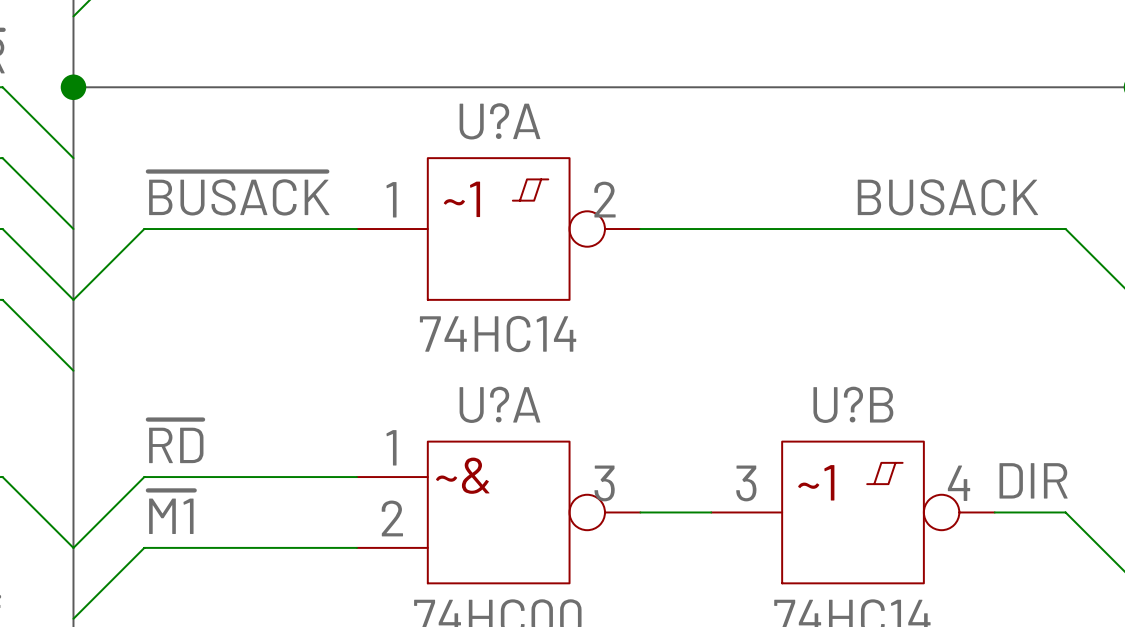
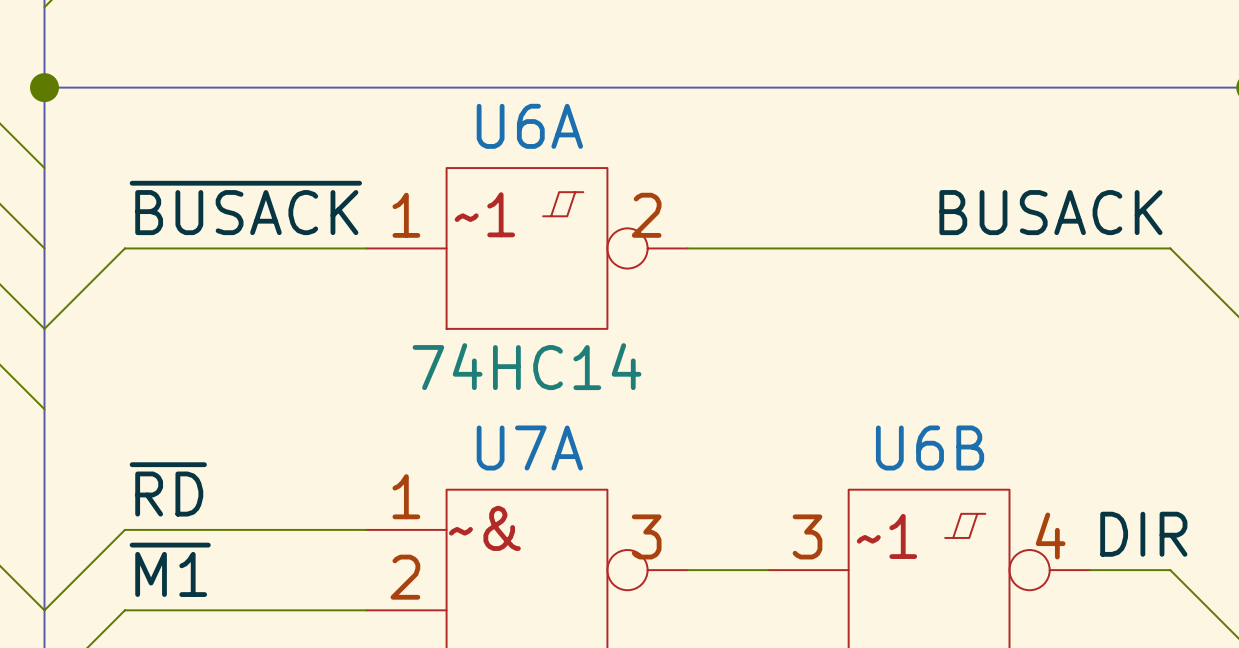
U?A name: U?A (499, 121) -> U6A (529, 126)
U?A name: U?A (499, 404) -> U7A (529, 447)
U?B name: U?B (853, 404) -> U6B (930, 447)

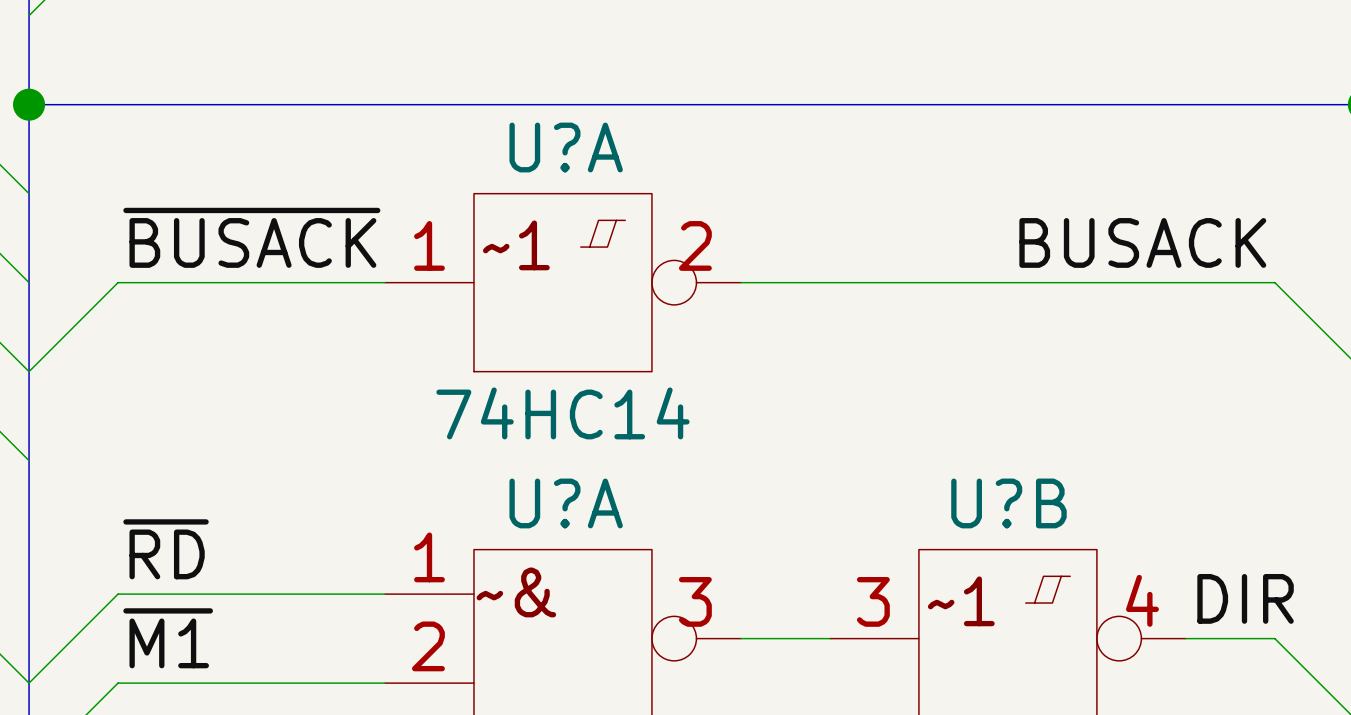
U6A name: U6A (529, 126) -> U?A (566, 147)
U7A name: U7A (529, 447) -> U?A (566, 503)
U6B name: U6B (930, 447) -> U?B (1008, 503)

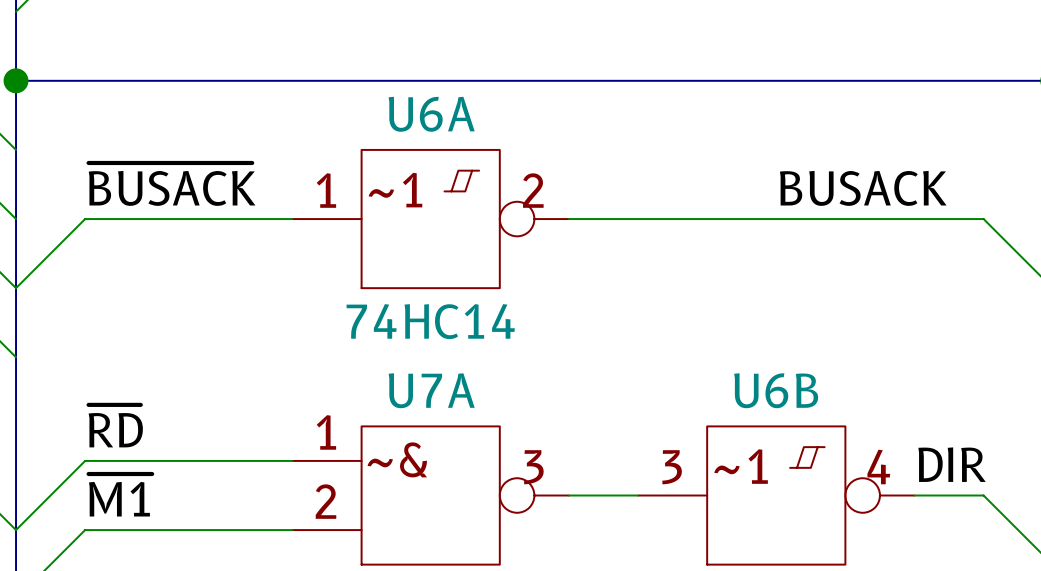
U?A name: U?A (566, 147) -> U6A (431, 114)
U?A name: U?A (566, 503) -> U7A (431, 390)
U?B name: U?B (1008, 503) -> U6B (776, 390)

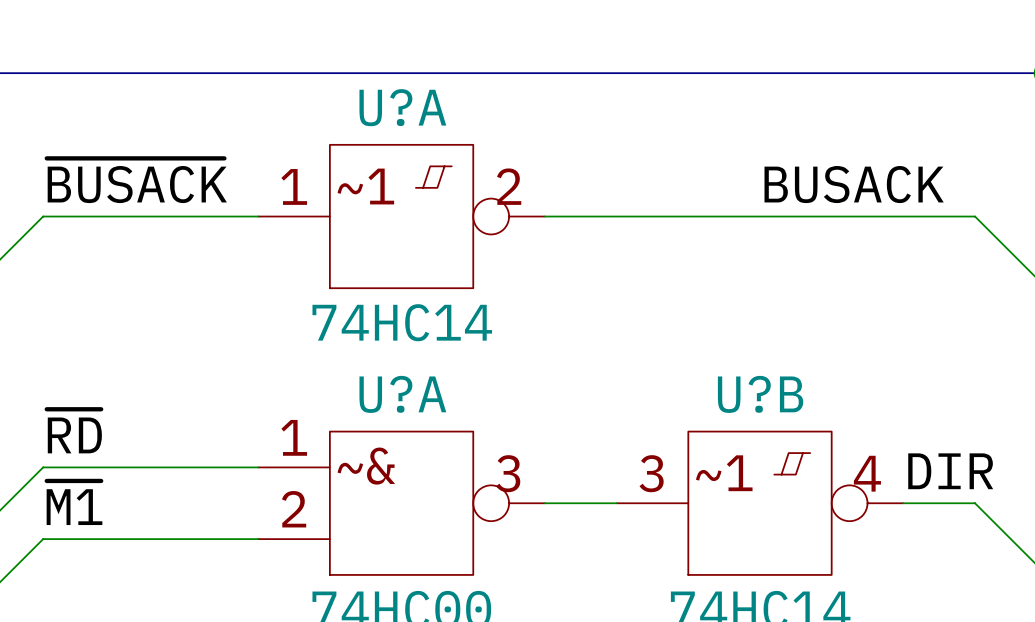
U6A name: U6A (431, 114) -> U?A (402, 107)
U7A name: U7A (431, 390) -> U?A (402, 394)
U6B name: U6B (776, 390) -> U?B (760, 394)

